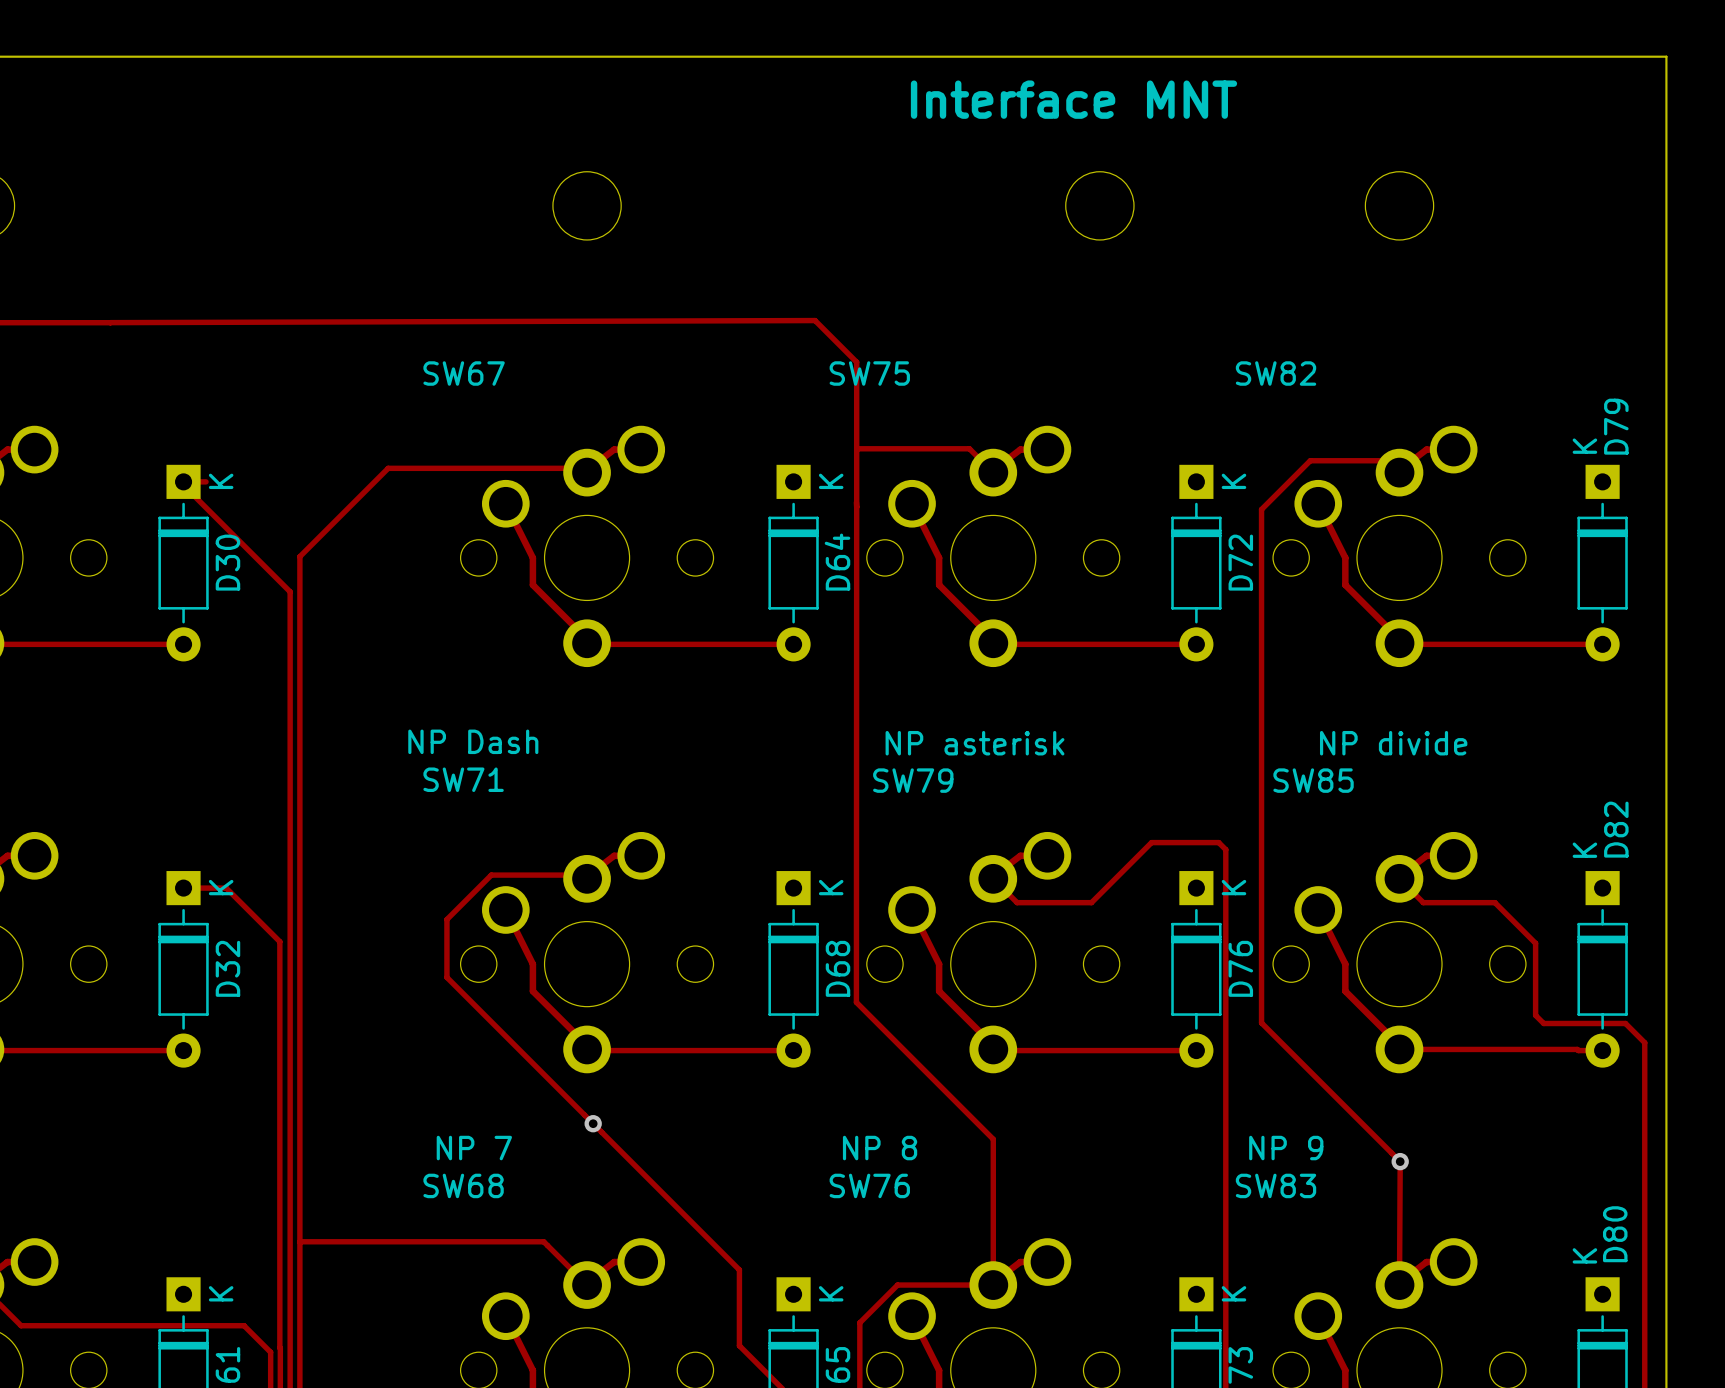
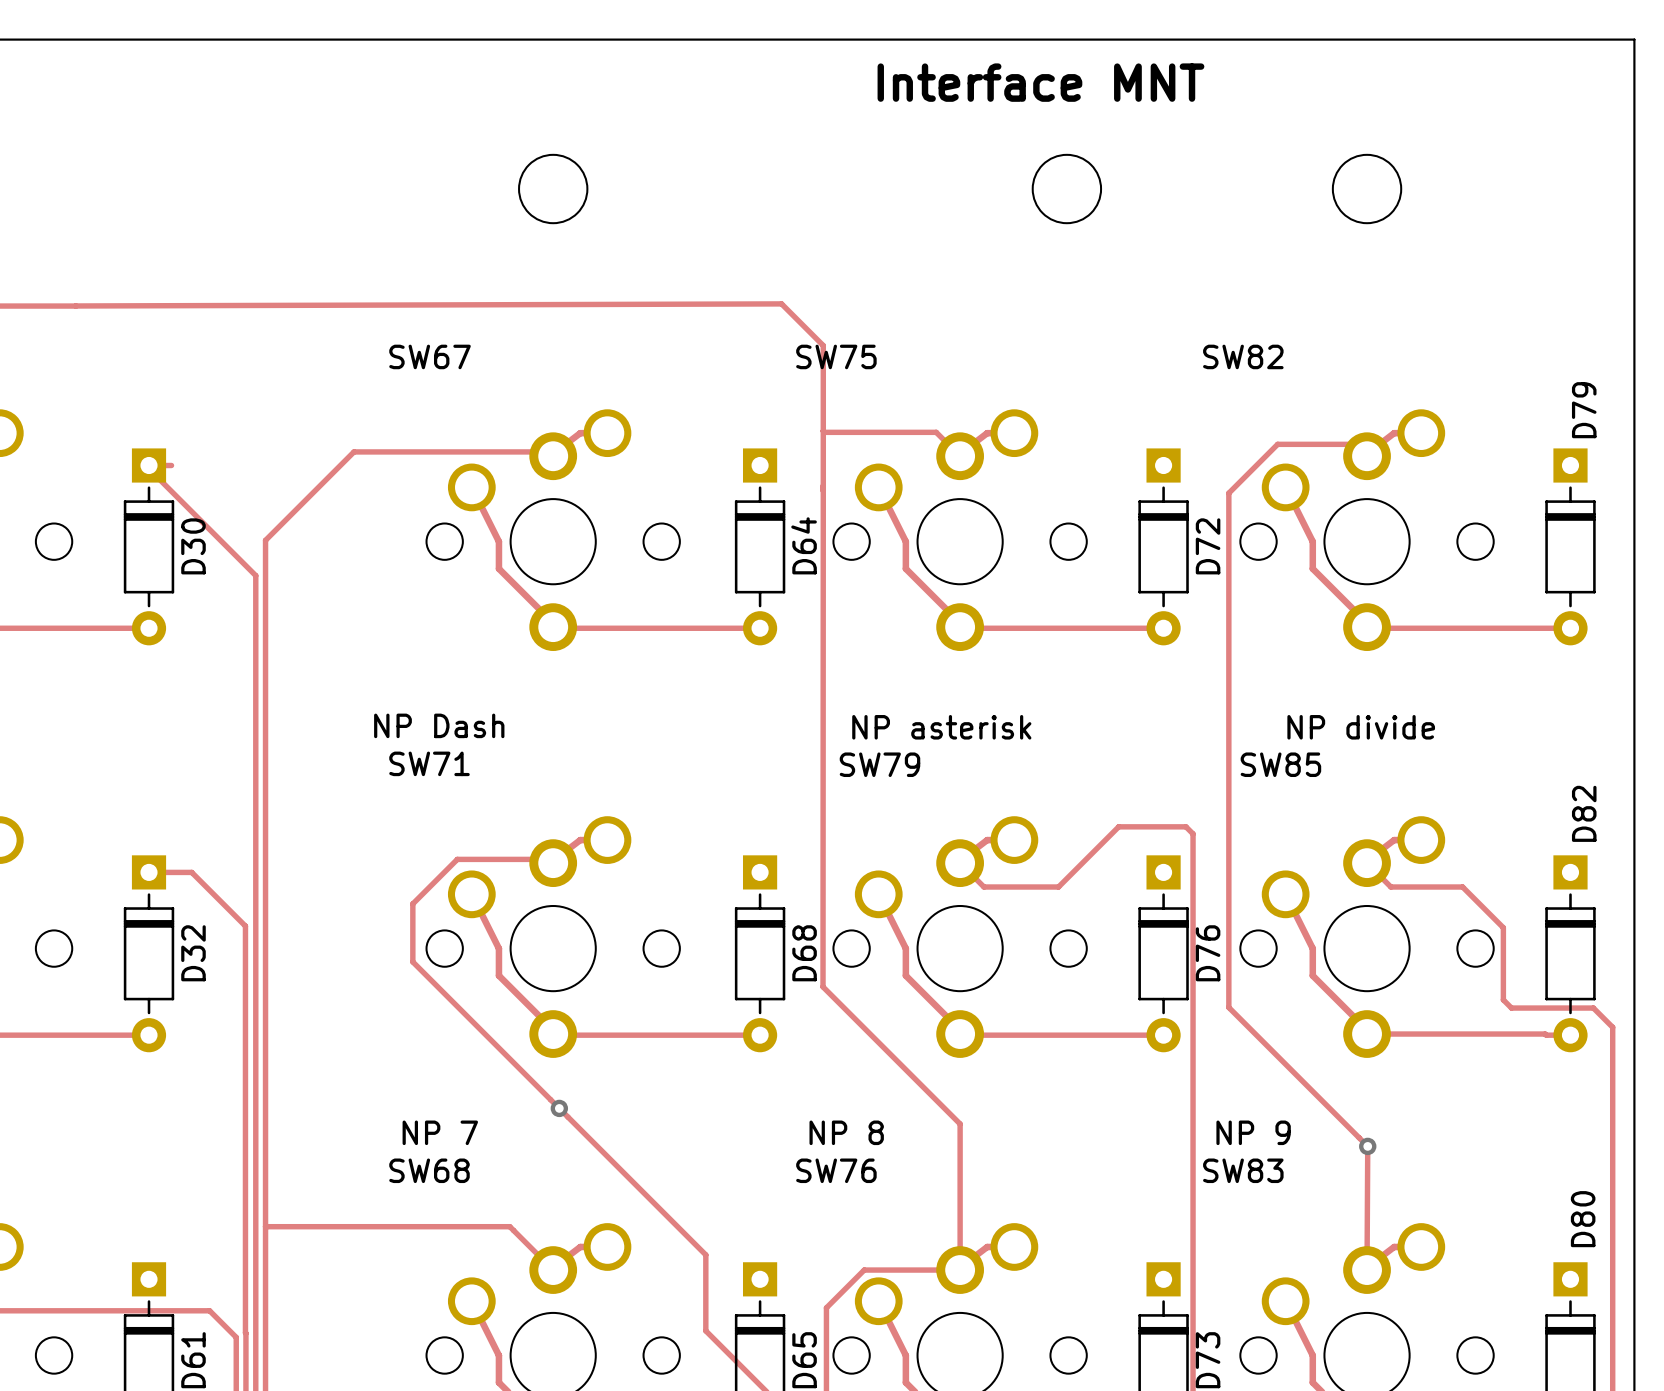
D79 text: K (1584, 446) -> none
D30 text: K (221, 481) -> none
D64 text: K (831, 481) -> none
D72 text: K (1233, 481) -> none
D82 text: K (1584, 850) -> none
D32 text: K (221, 887) -> none
D68 text: K (831, 887) -> none
D76 text: K (1233, 887) -> none
D80 text: K (1584, 1255) -> none
D61 text: K (221, 1293) -> none
D65 text: K (831, 1293) -> none
D73 text: K (1233, 1293) -> none

